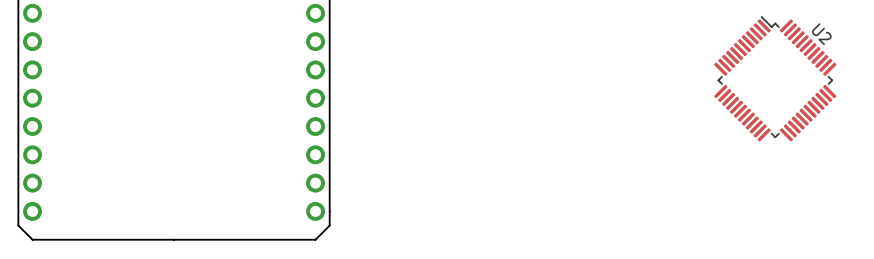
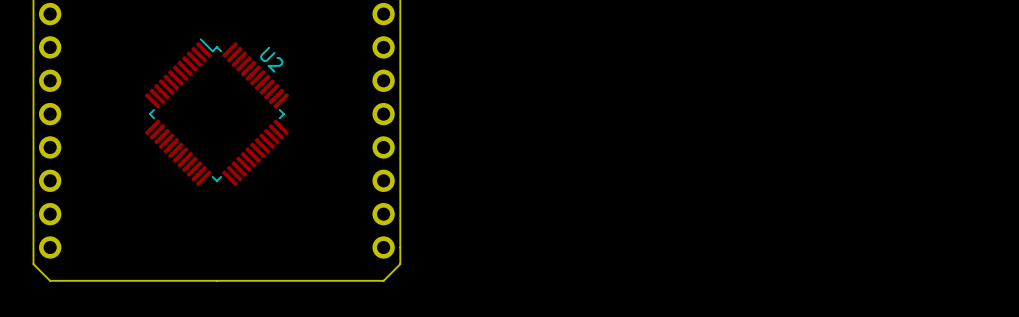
U2 position: (775, 78) -> (216, 112)

